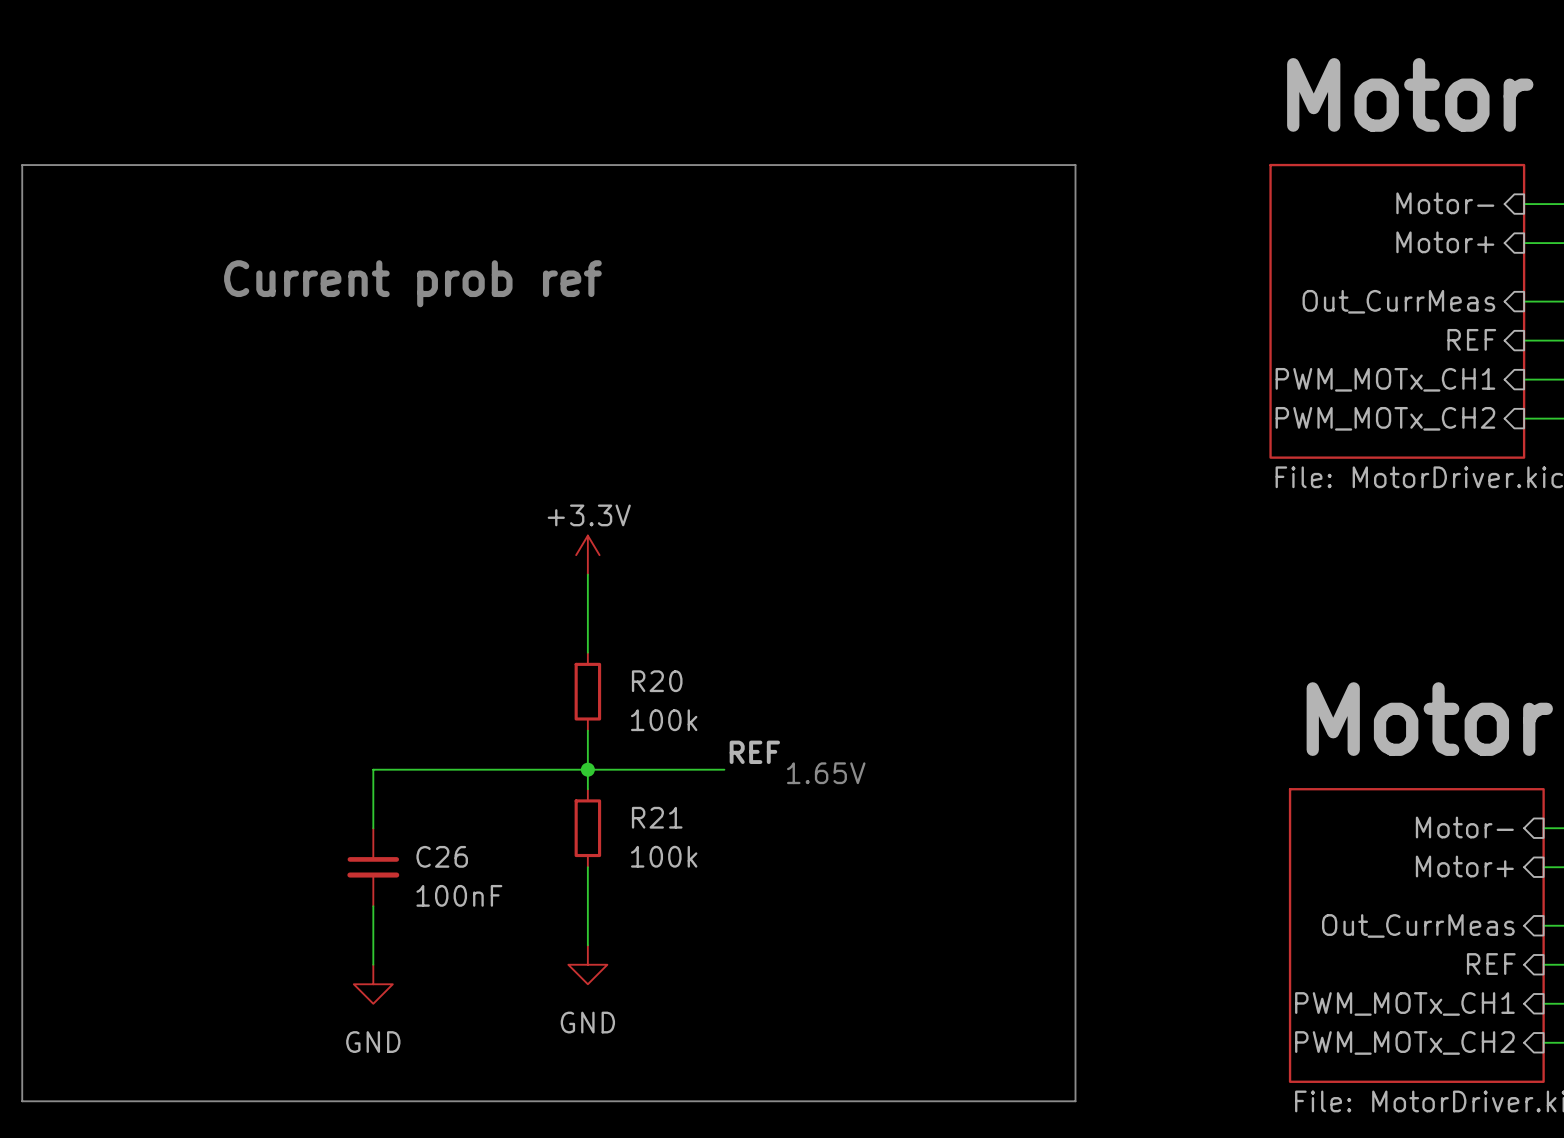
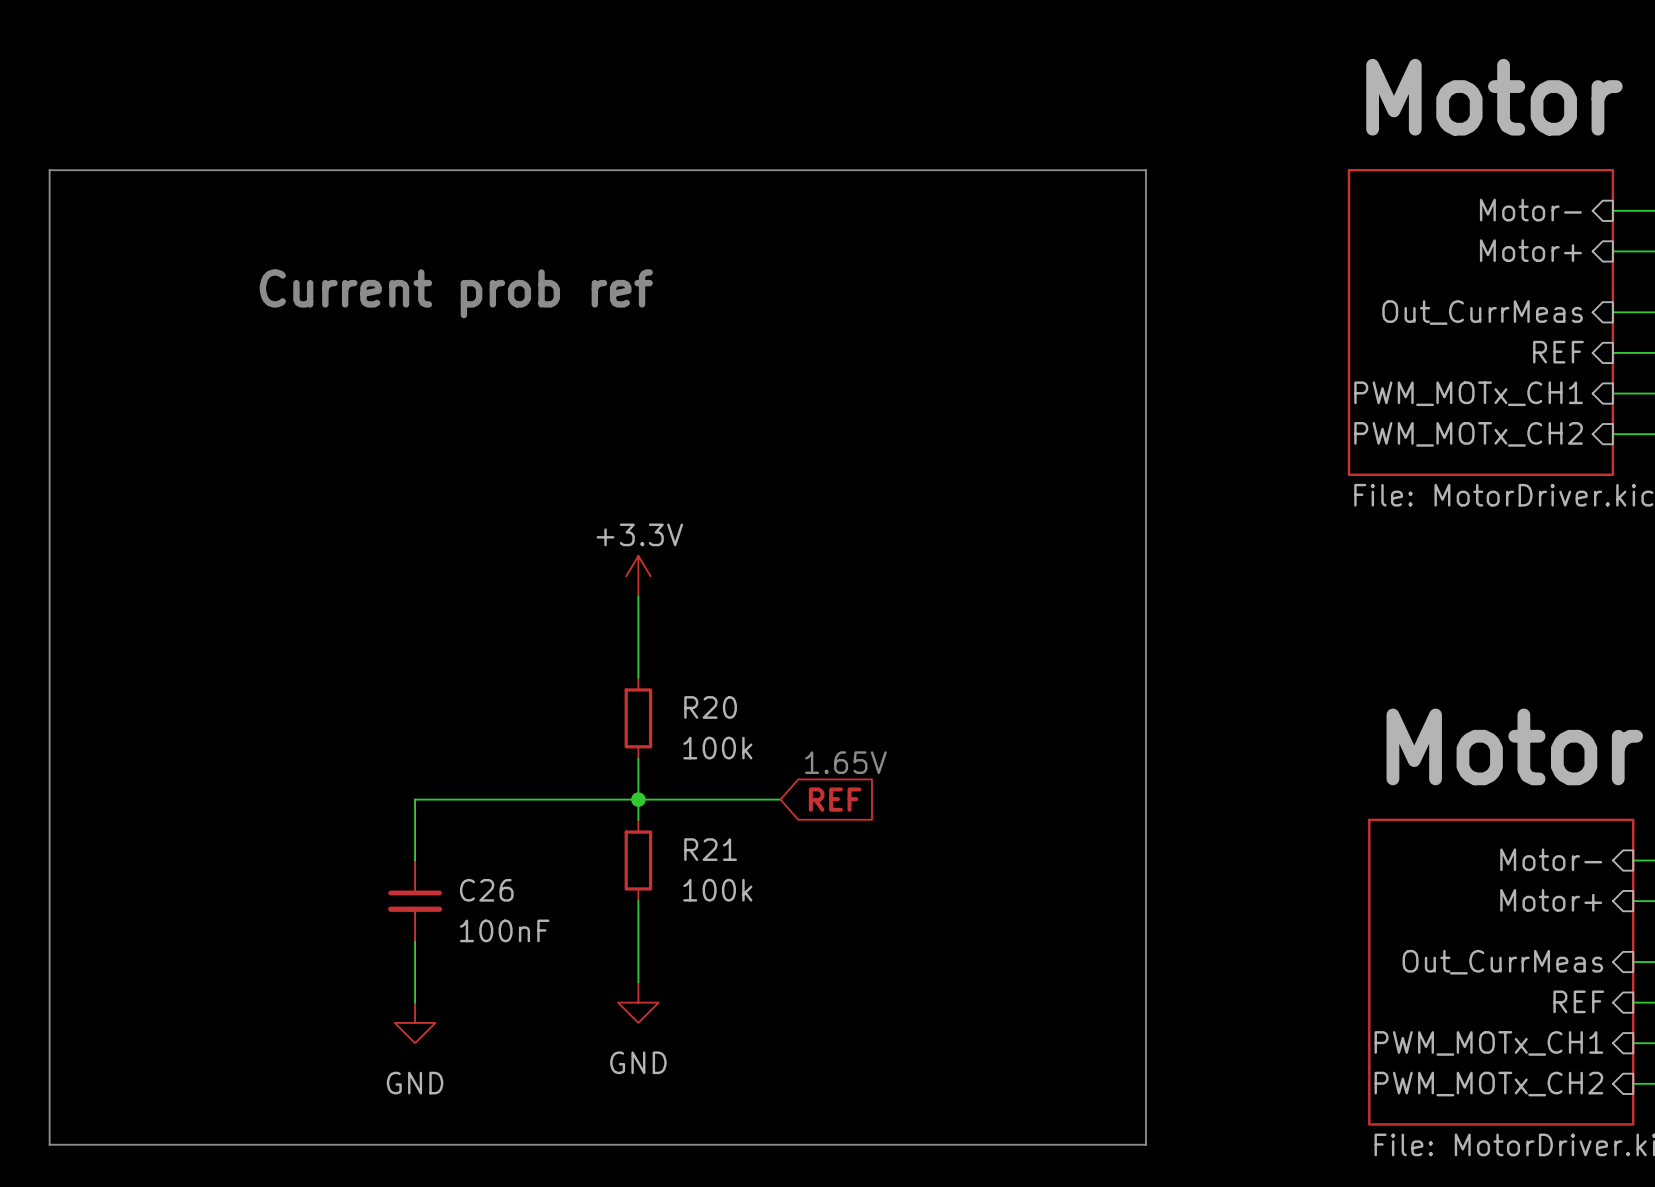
label: REF (754, 752) -> none
global label: none -> REF (835, 799)
text position: 1.65V (826, 773) -> 1.65V (845, 762)

